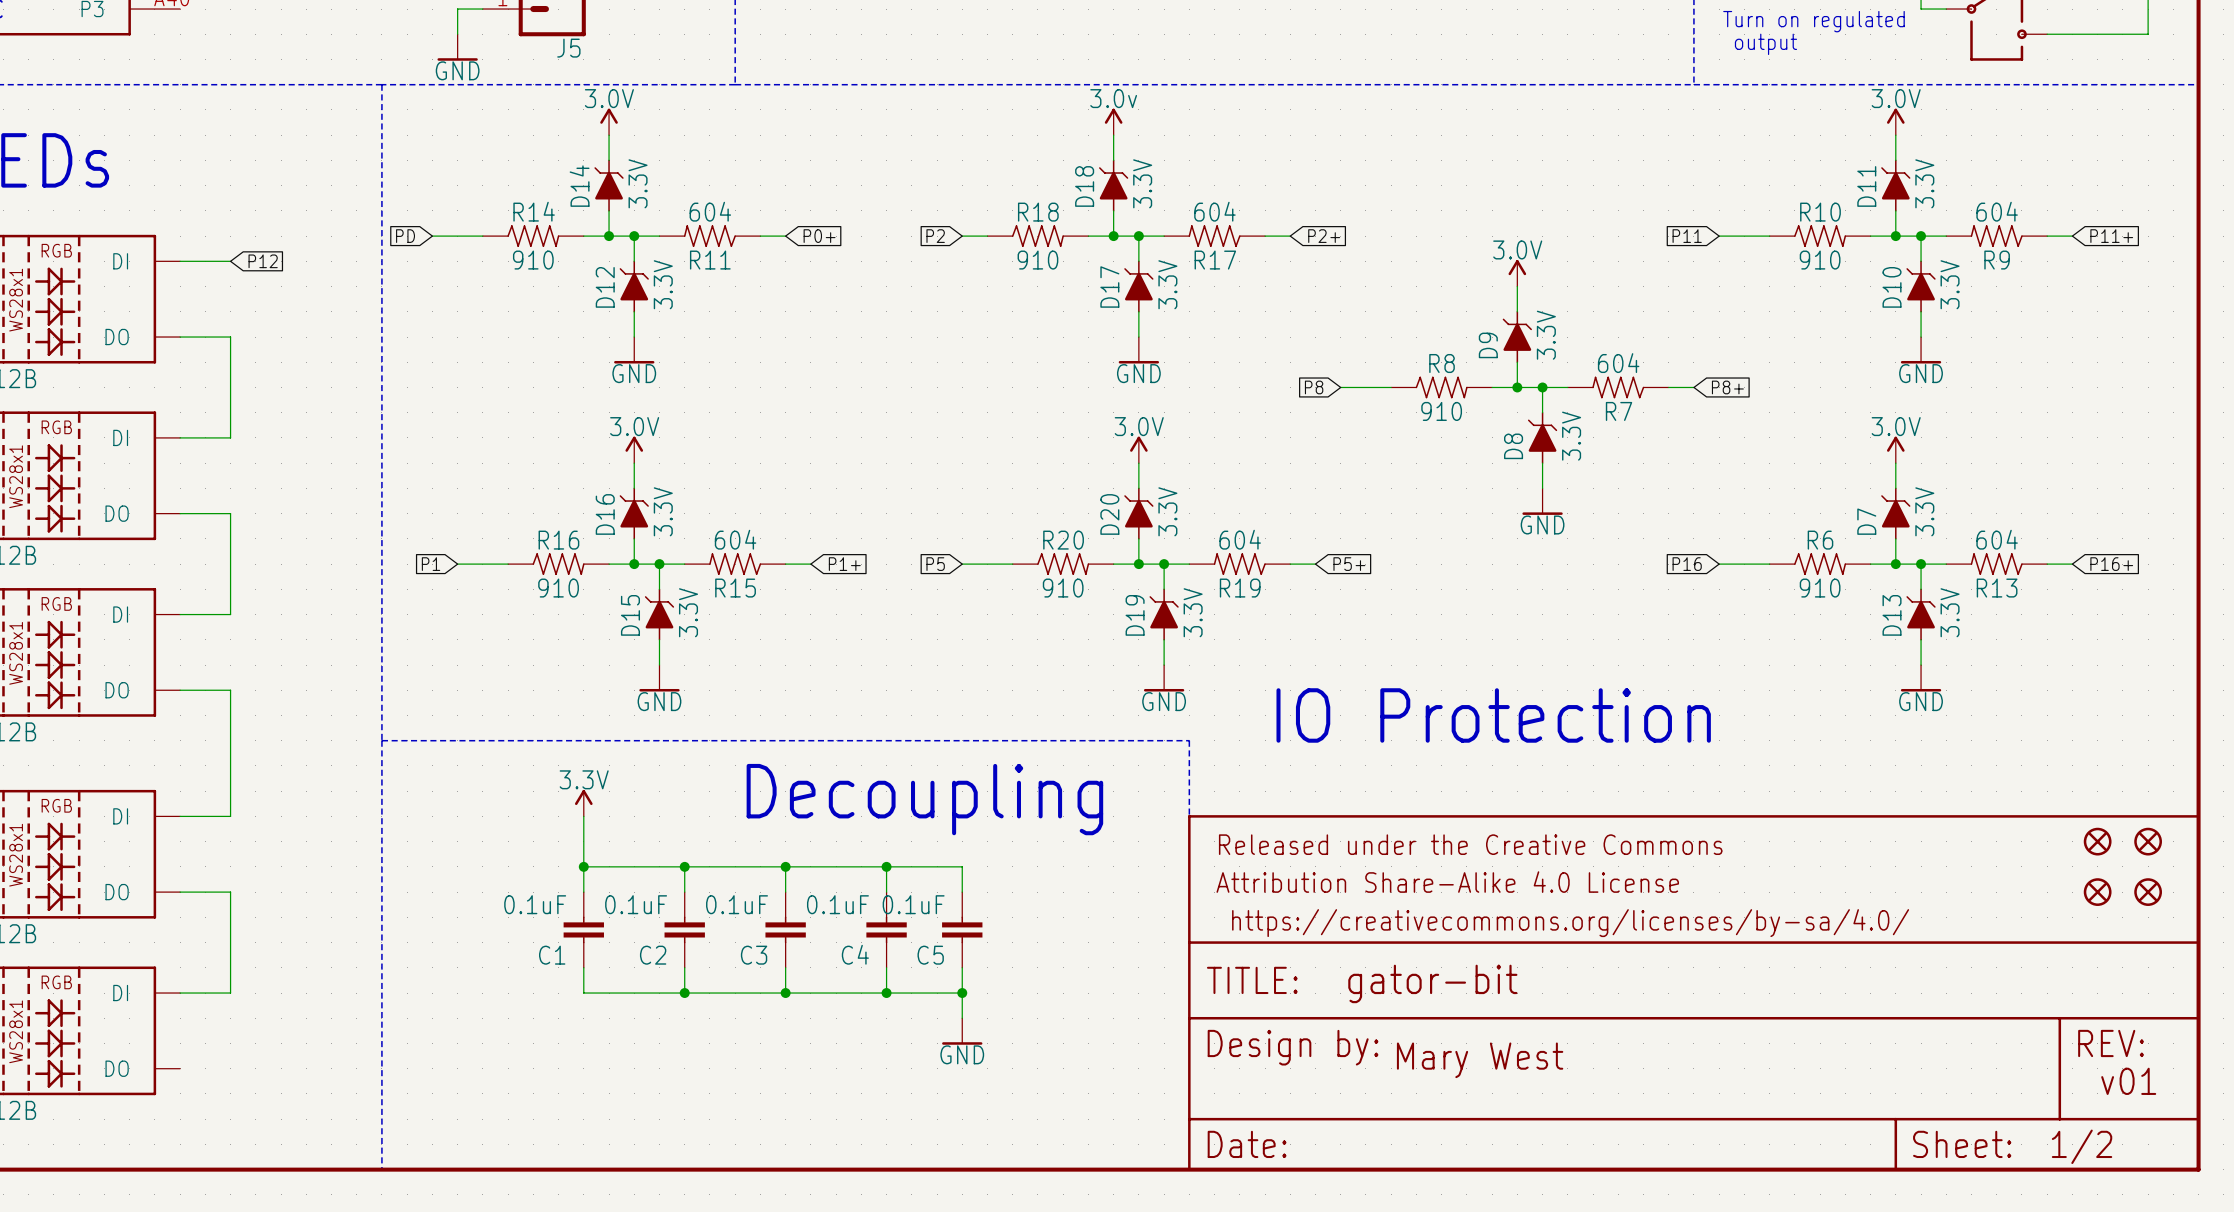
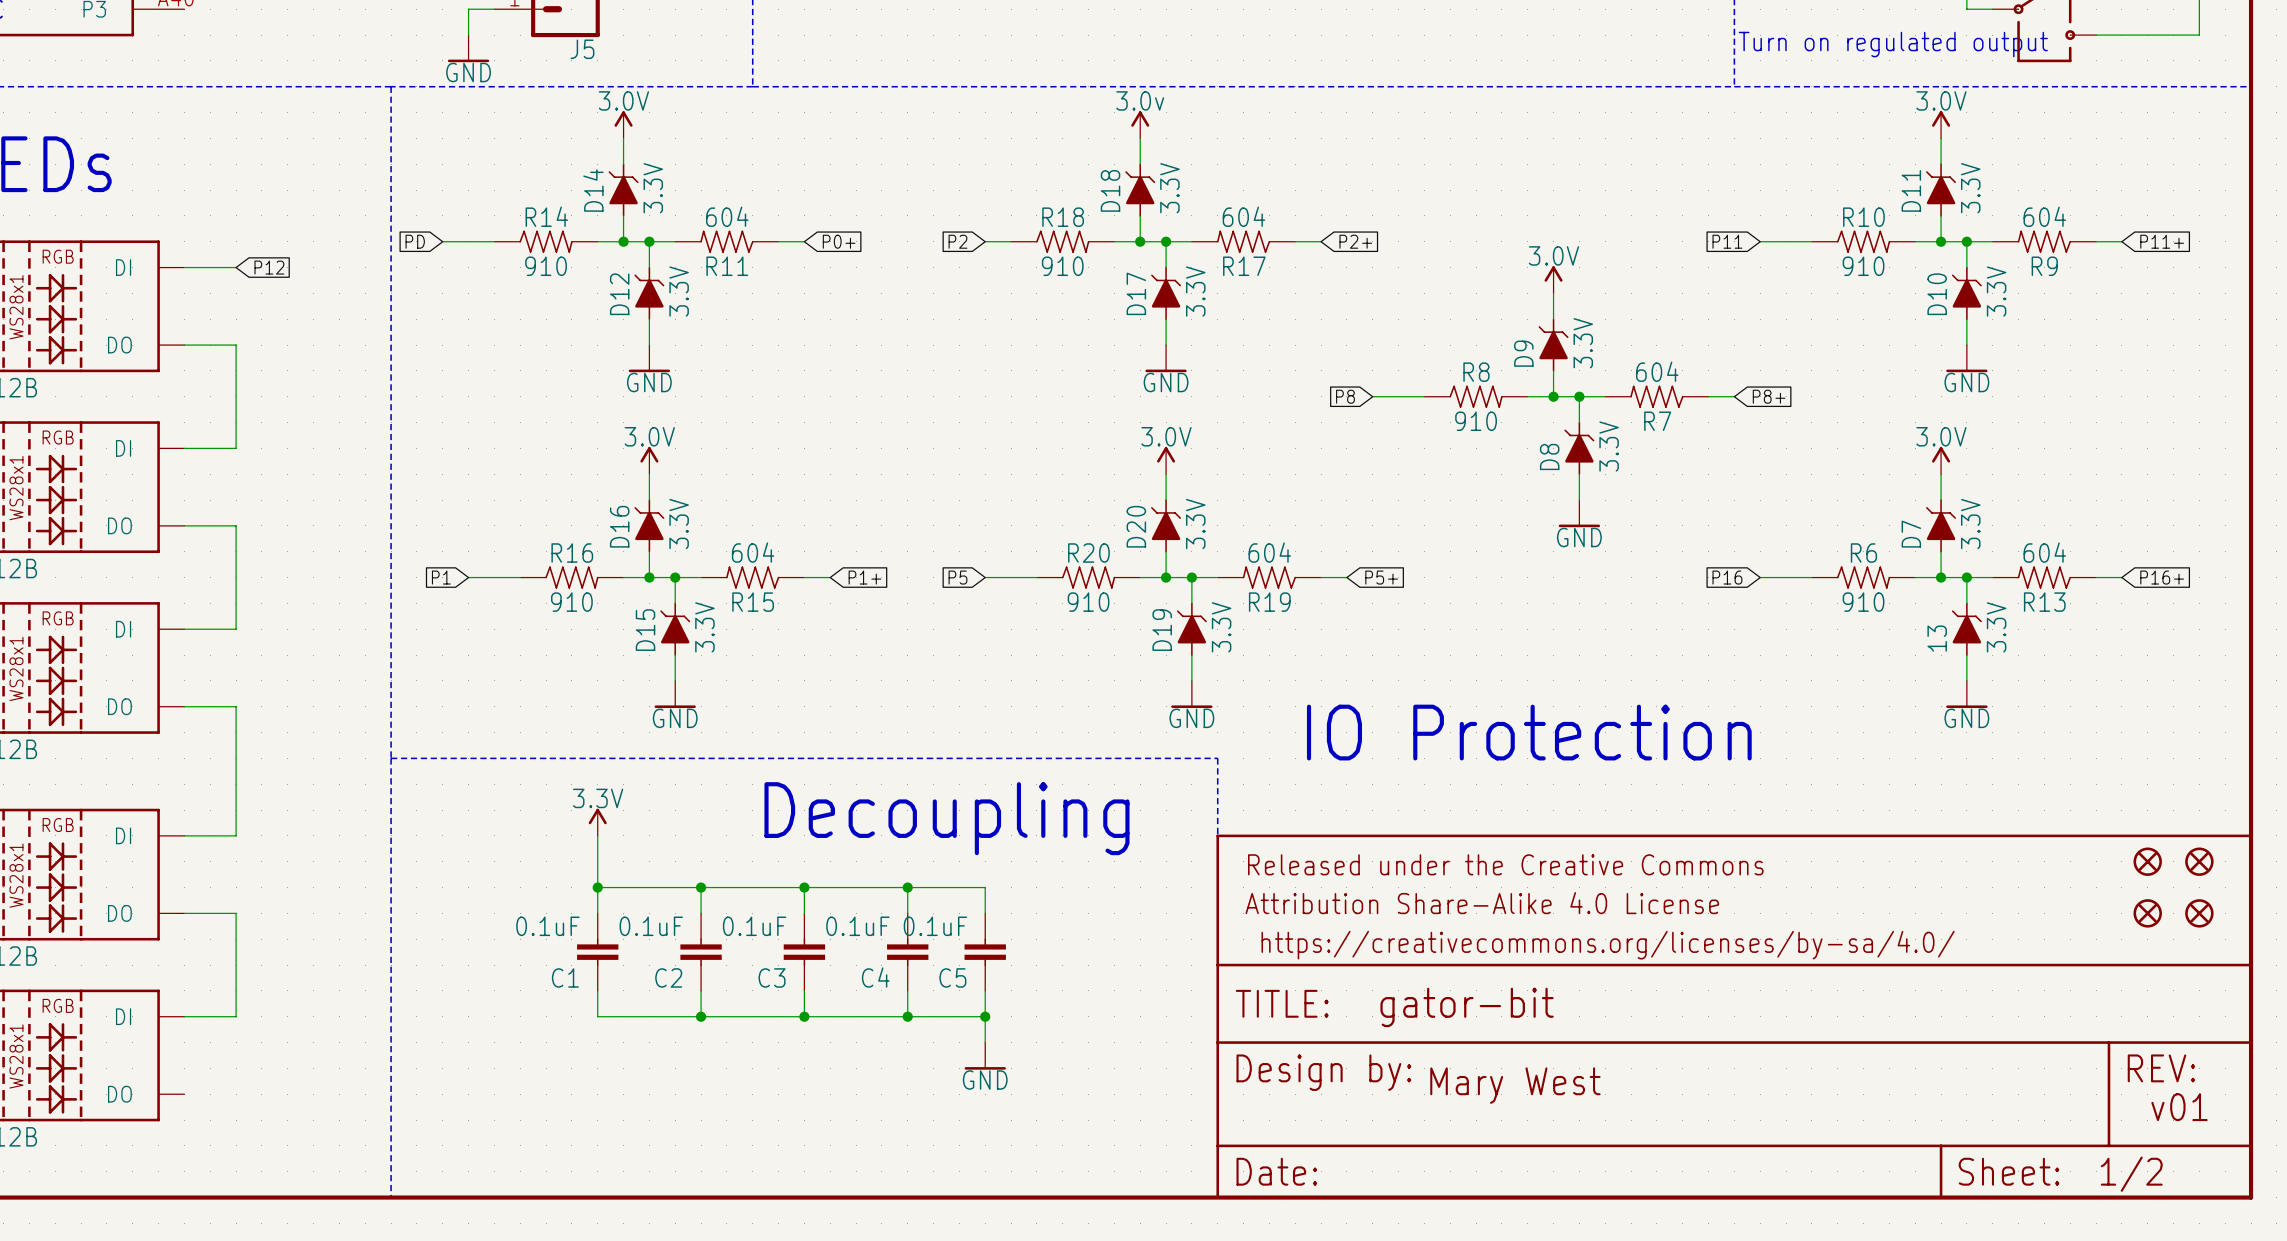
text: Turn on regulated (1813, 21) -> Turn on regulated output (1893, 44)
text: output (1765, 44) -> none
D13 name: D13 (1892, 615) -> 13 (1937, 638)

